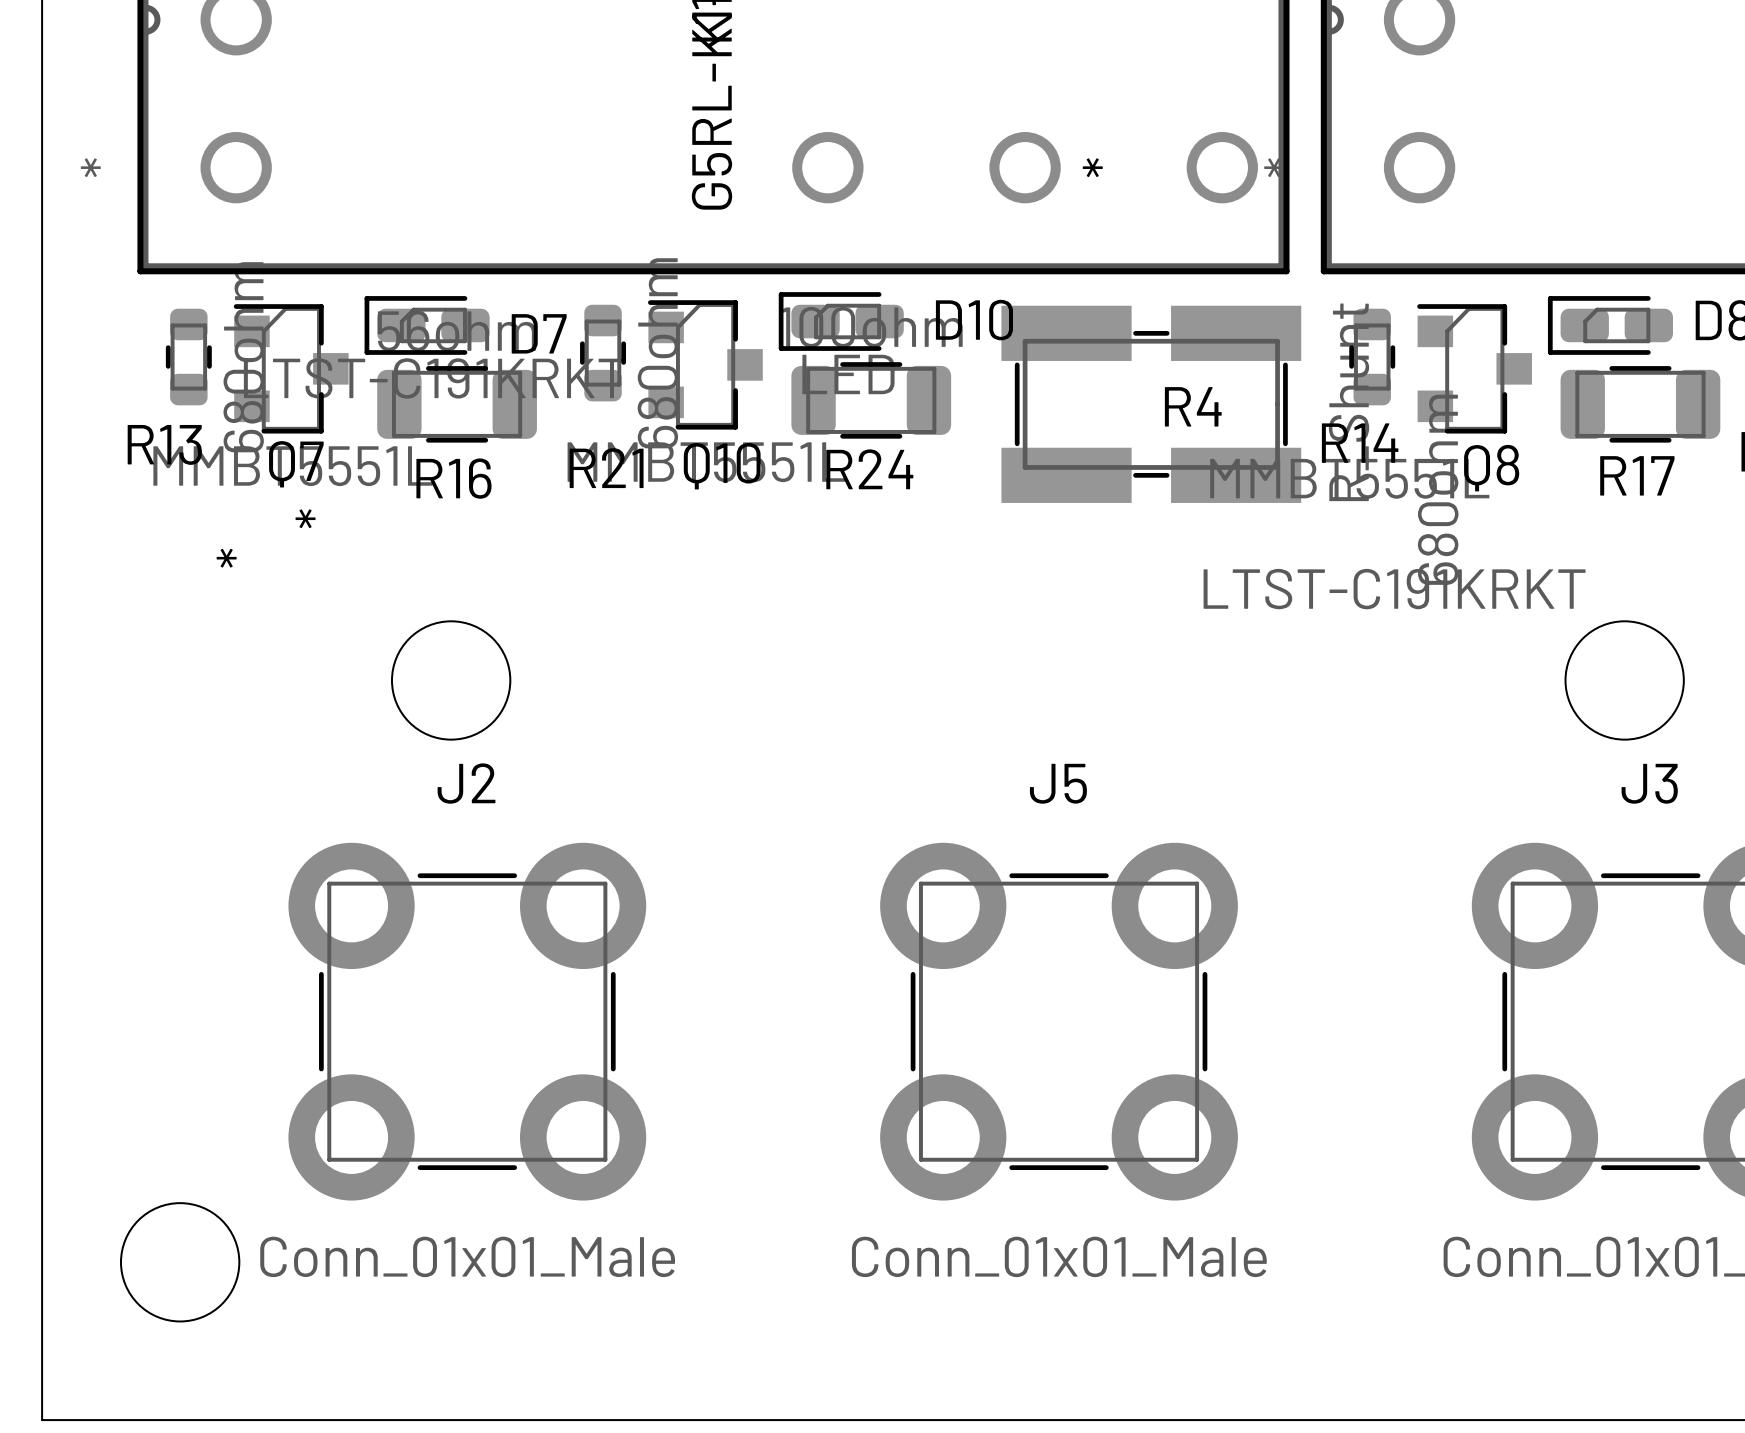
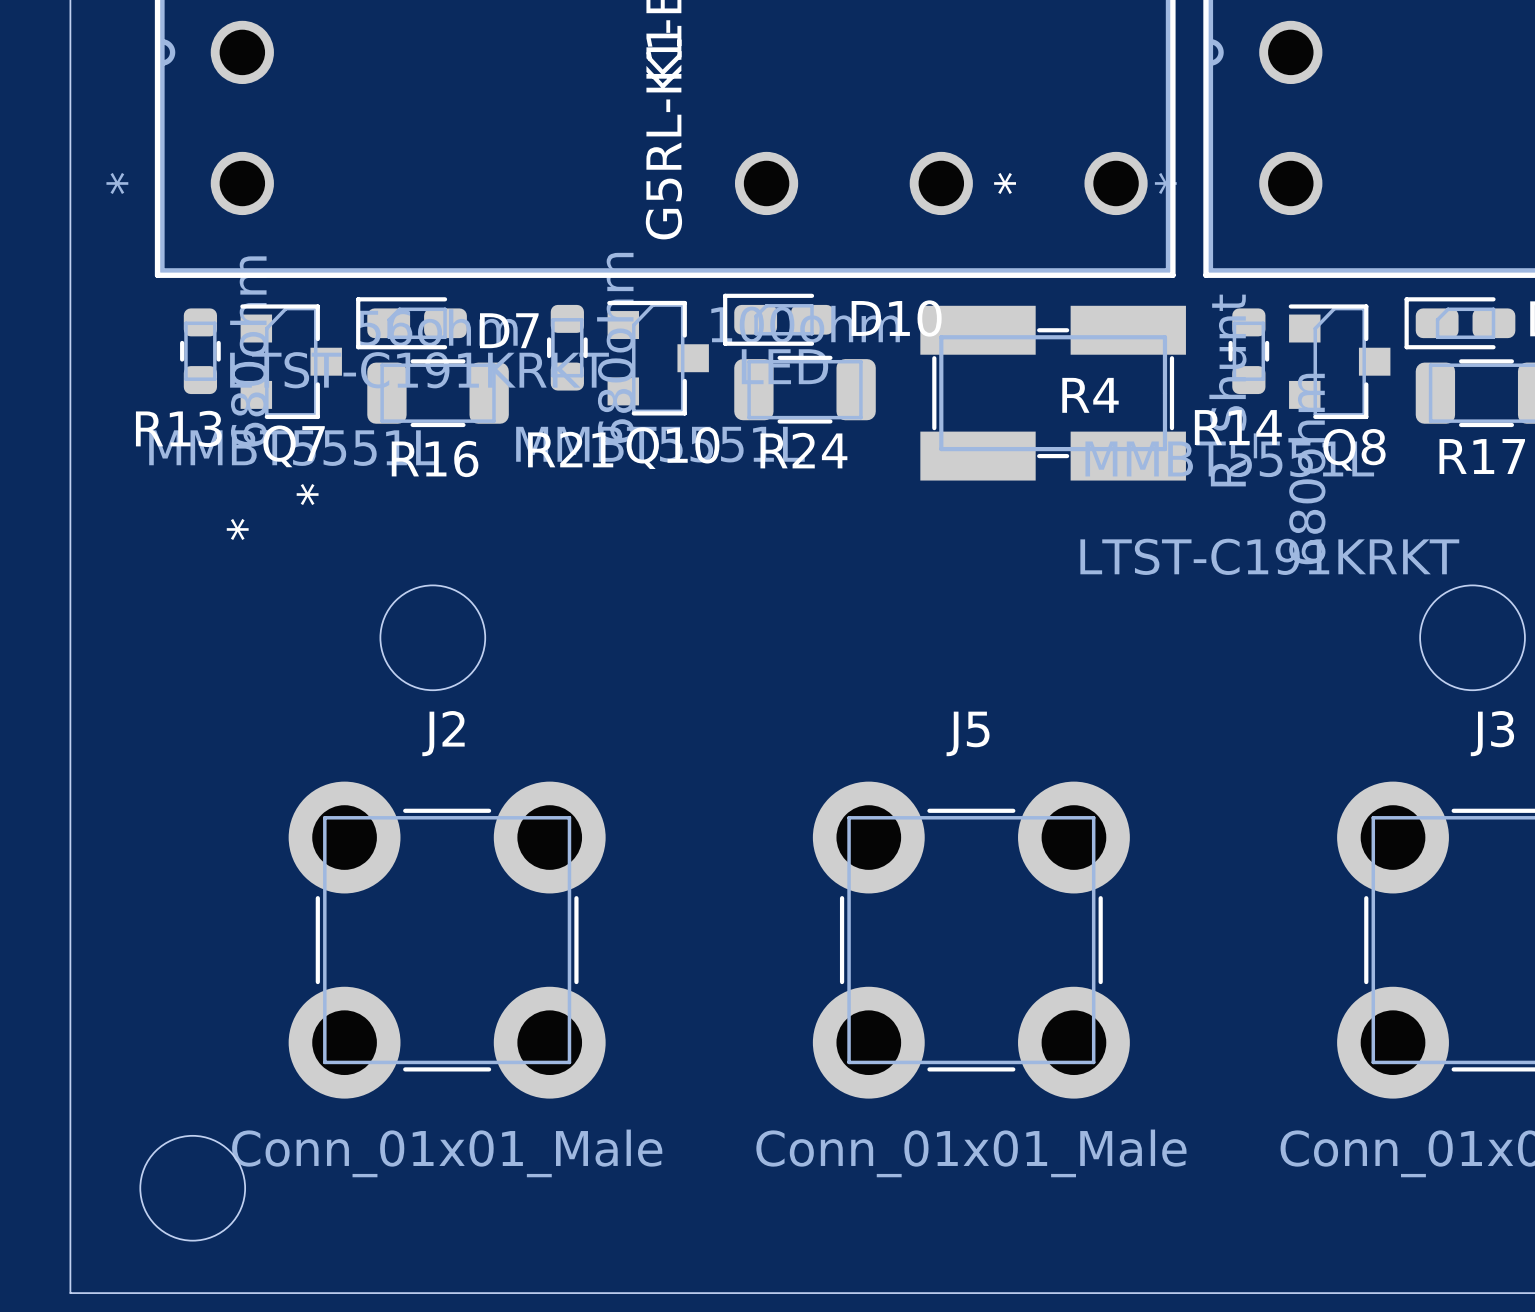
round board edge position: (180, 1262) -> (192, 1188)

